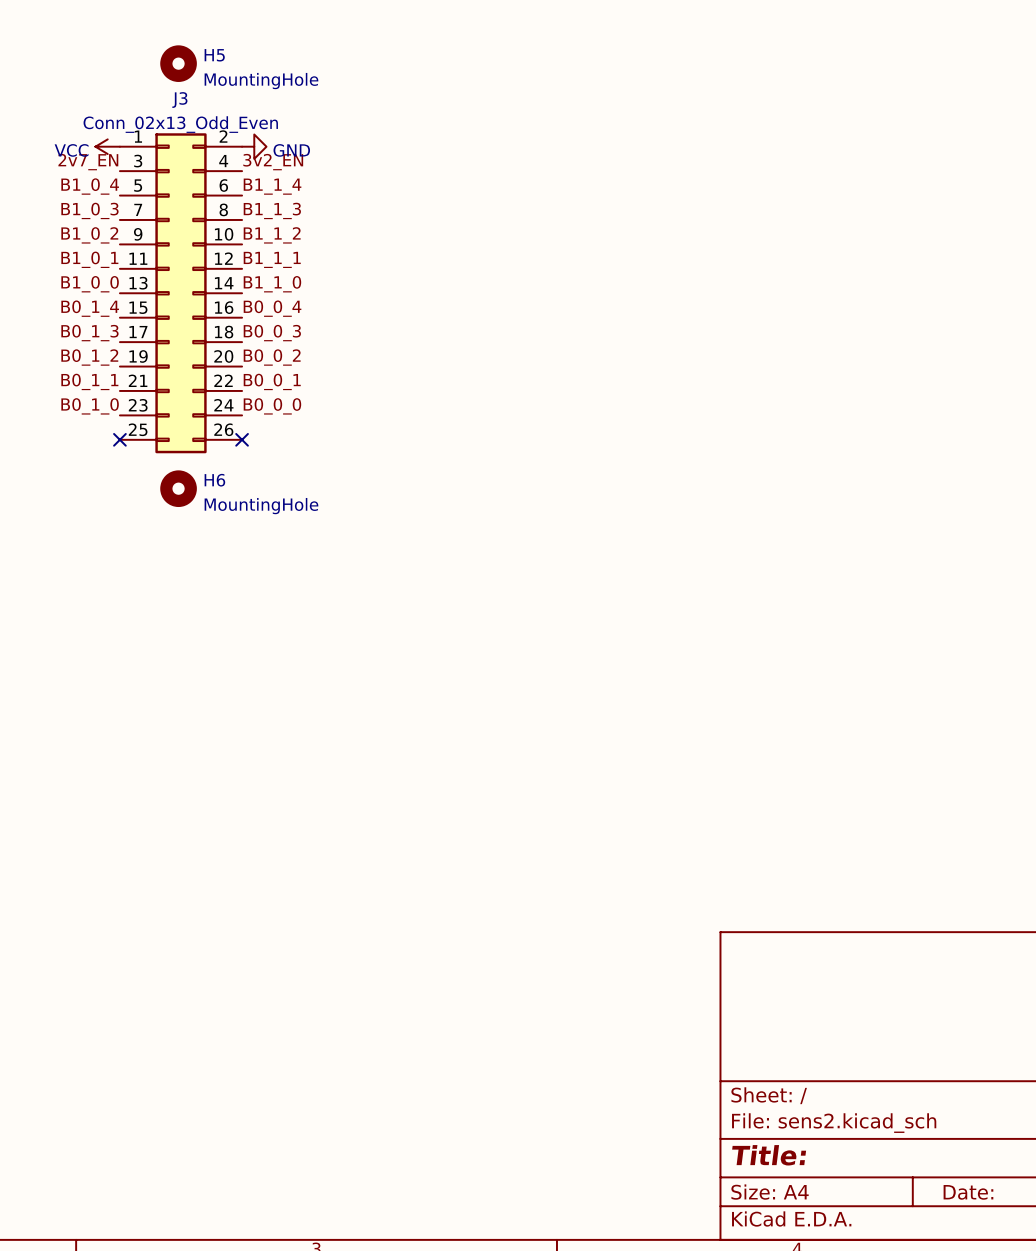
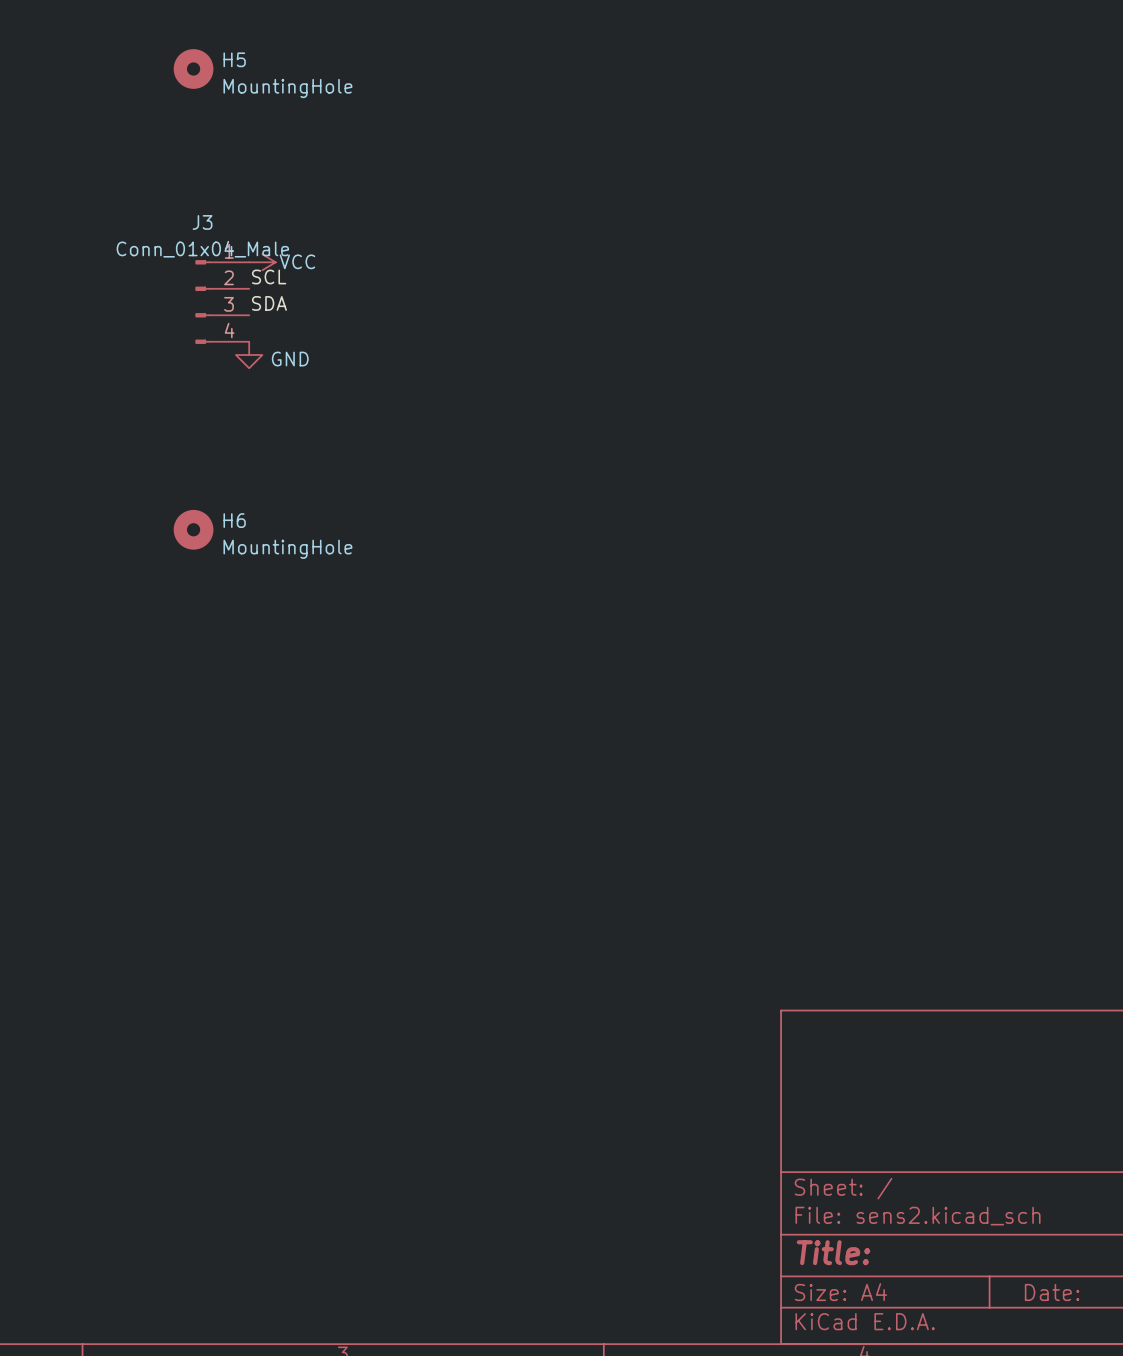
J3 name position: J3 (179, 100) -> J3 (202, 222)
J3 value: Conn_02x13_Odd_Even (180, 124) -> Conn_01x04_Male (202, 249)
J3 symbol: [119, 133, 243, 454] -> [195, 260, 250, 344]
power symbol rotation: 0° (107, 146) -> 180° (262, 262)
power symbol position: VCC (107, 146) -> VCC (262, 262)
power symbol rotation: 0° (254, 146) -> 90° clockwise (249, 355)
power symbol position: GND (254, 146) -> GND (249, 355)
label: 2v7_EN (88, 162) -> none
label: 3v2_EN (273, 162) -> none
label: B1_0_4 (90, 186) -> none
label: B1_1_4 (272, 186) -> none
label: B1_0_3 (89, 210) -> none
label: B1_1_3 (272, 210) -> none
label: B1_0_2 (89, 235) -> none
label: B1_1_2 (272, 235) -> none
label: none -> SCL (269, 276)
label: B1_0_1 (89, 259) -> none
label: B1_1_1 (272, 259) -> none
label: none -> SDA (269, 303)
label: B1_0_0 (90, 284) -> none
label: B1_1_0 (272, 284) -> none
label: B0_1_4 (90, 308) -> none
label: B0_0_4 (272, 308) -> none
label: B0_1_3 (89, 333) -> none
label: B0_0_3 (272, 333) -> none
label: B0_1_2 (89, 357) -> none
label: B0_0_2 (272, 357) -> none
label: B0_1_1 (89, 381) -> none
label: B0_0_1 (272, 381) -> none
label: B0_1_0 (90, 406) -> none
label: B0_0_0 (272, 406) -> none
no-connect mark: (119, 439) -> none
no-connect mark: (242, 439) -> none

